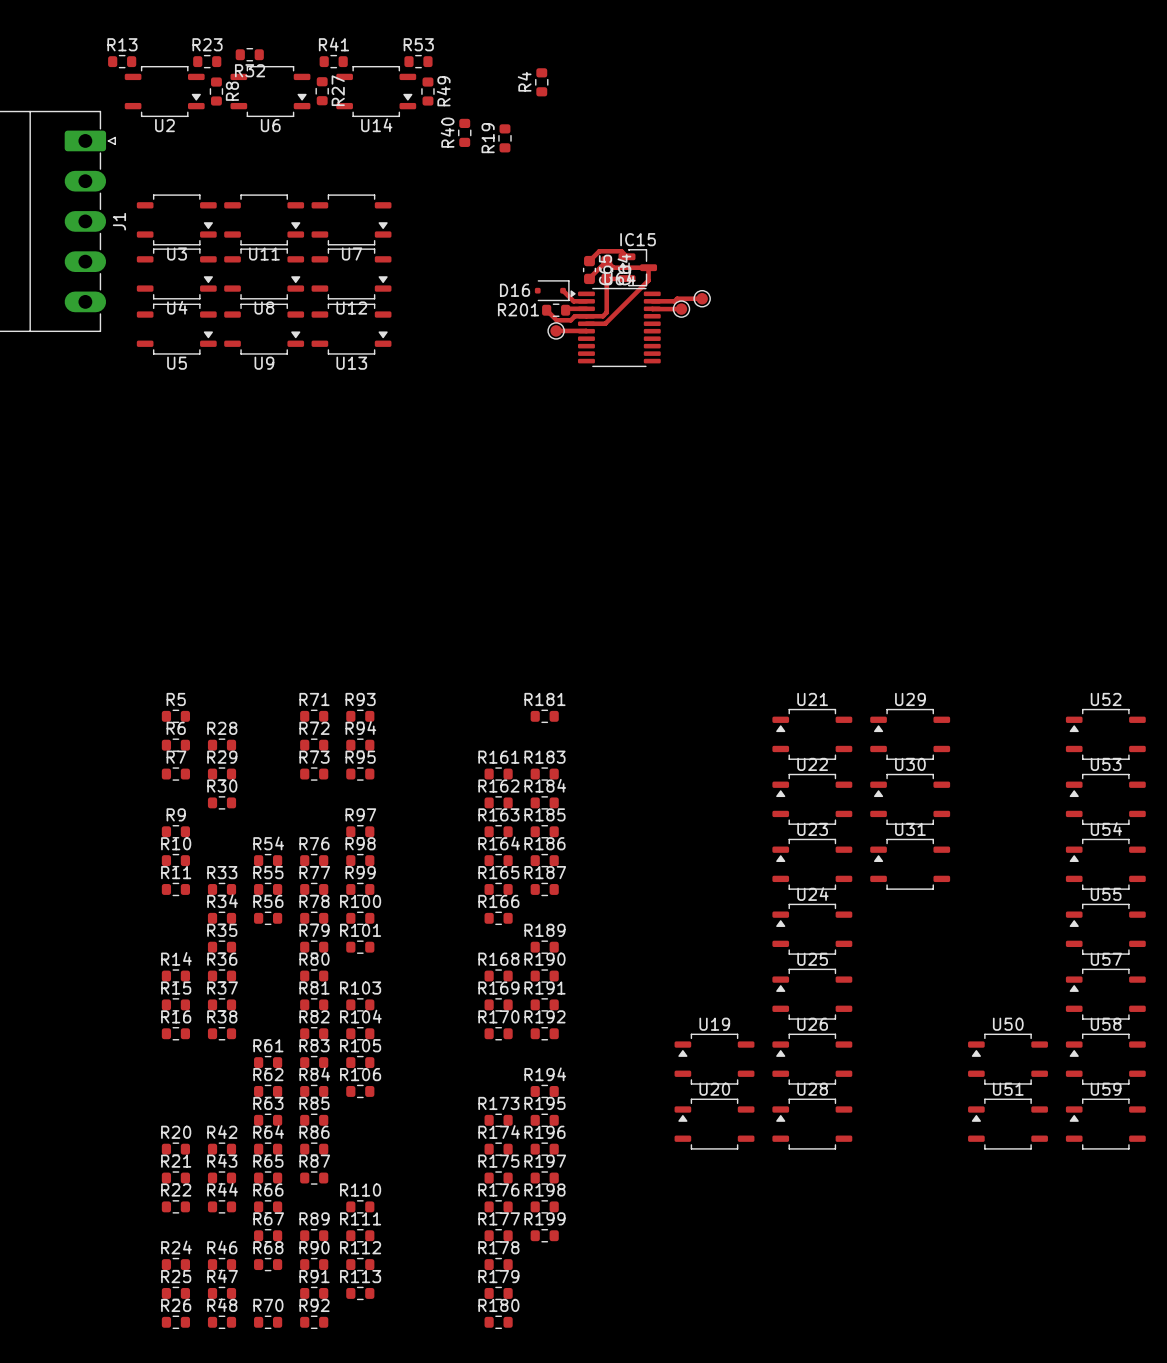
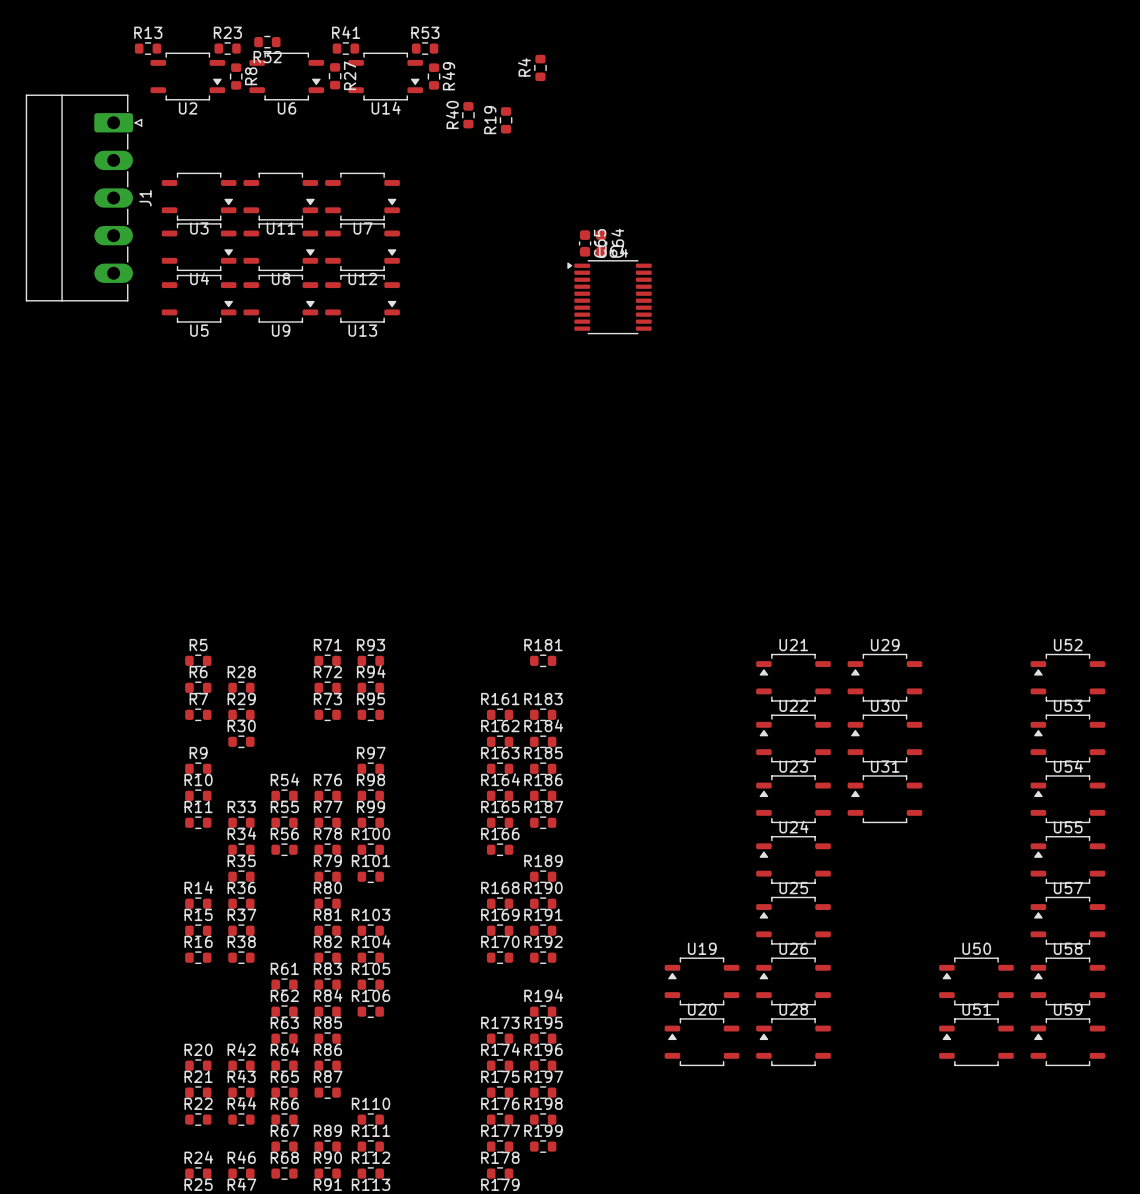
top track: (626, 256) (621, 251) (599, 251) (589, 261) -> none
IC15: (637, 267) -> none
top track: (589, 278) (606, 261) (613, 267) (648, 267) (648, 280) (605, 323) (586, 323) -> none
top track: (626, 278) (606, 278) (606, 312) (602, 316) (574, 316) (570, 320) (556, 320) (546, 310) -> none
D16: (552, 290) -> none
top track: (563, 290) (573, 301) (586, 301) -> none
top track: (702, 298) (652, 301) -> none
part: (702, 298) -> none
top track: (586, 308) (565, 310) -> none
top track: (652, 308) (681, 309) -> none
part: (681, 309) -> none
R201: (556, 310) -> none
top track: (556, 330) (586, 331) -> none
part: (556, 330) -> none

